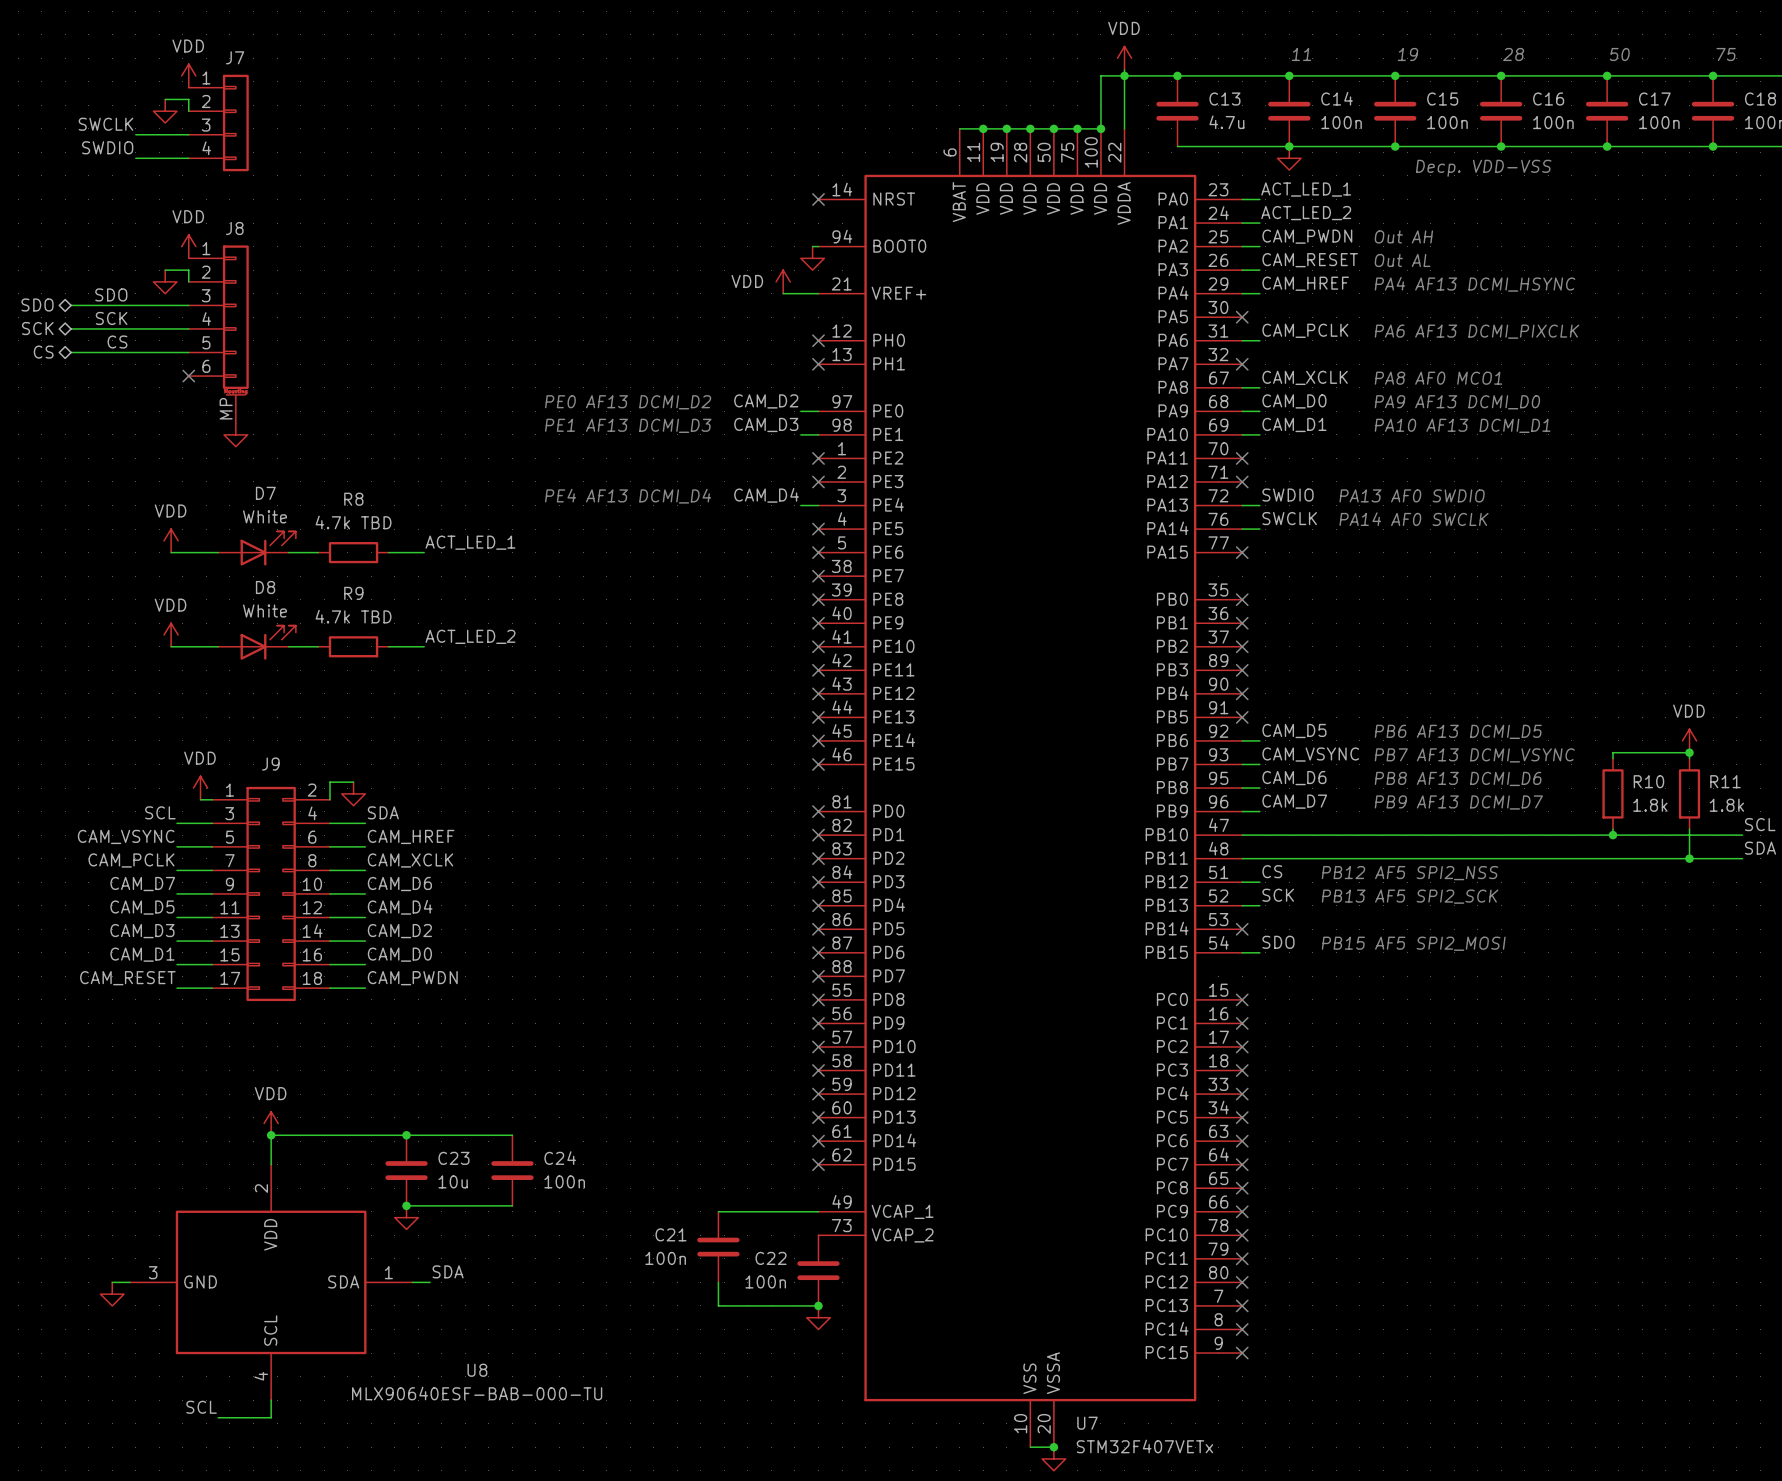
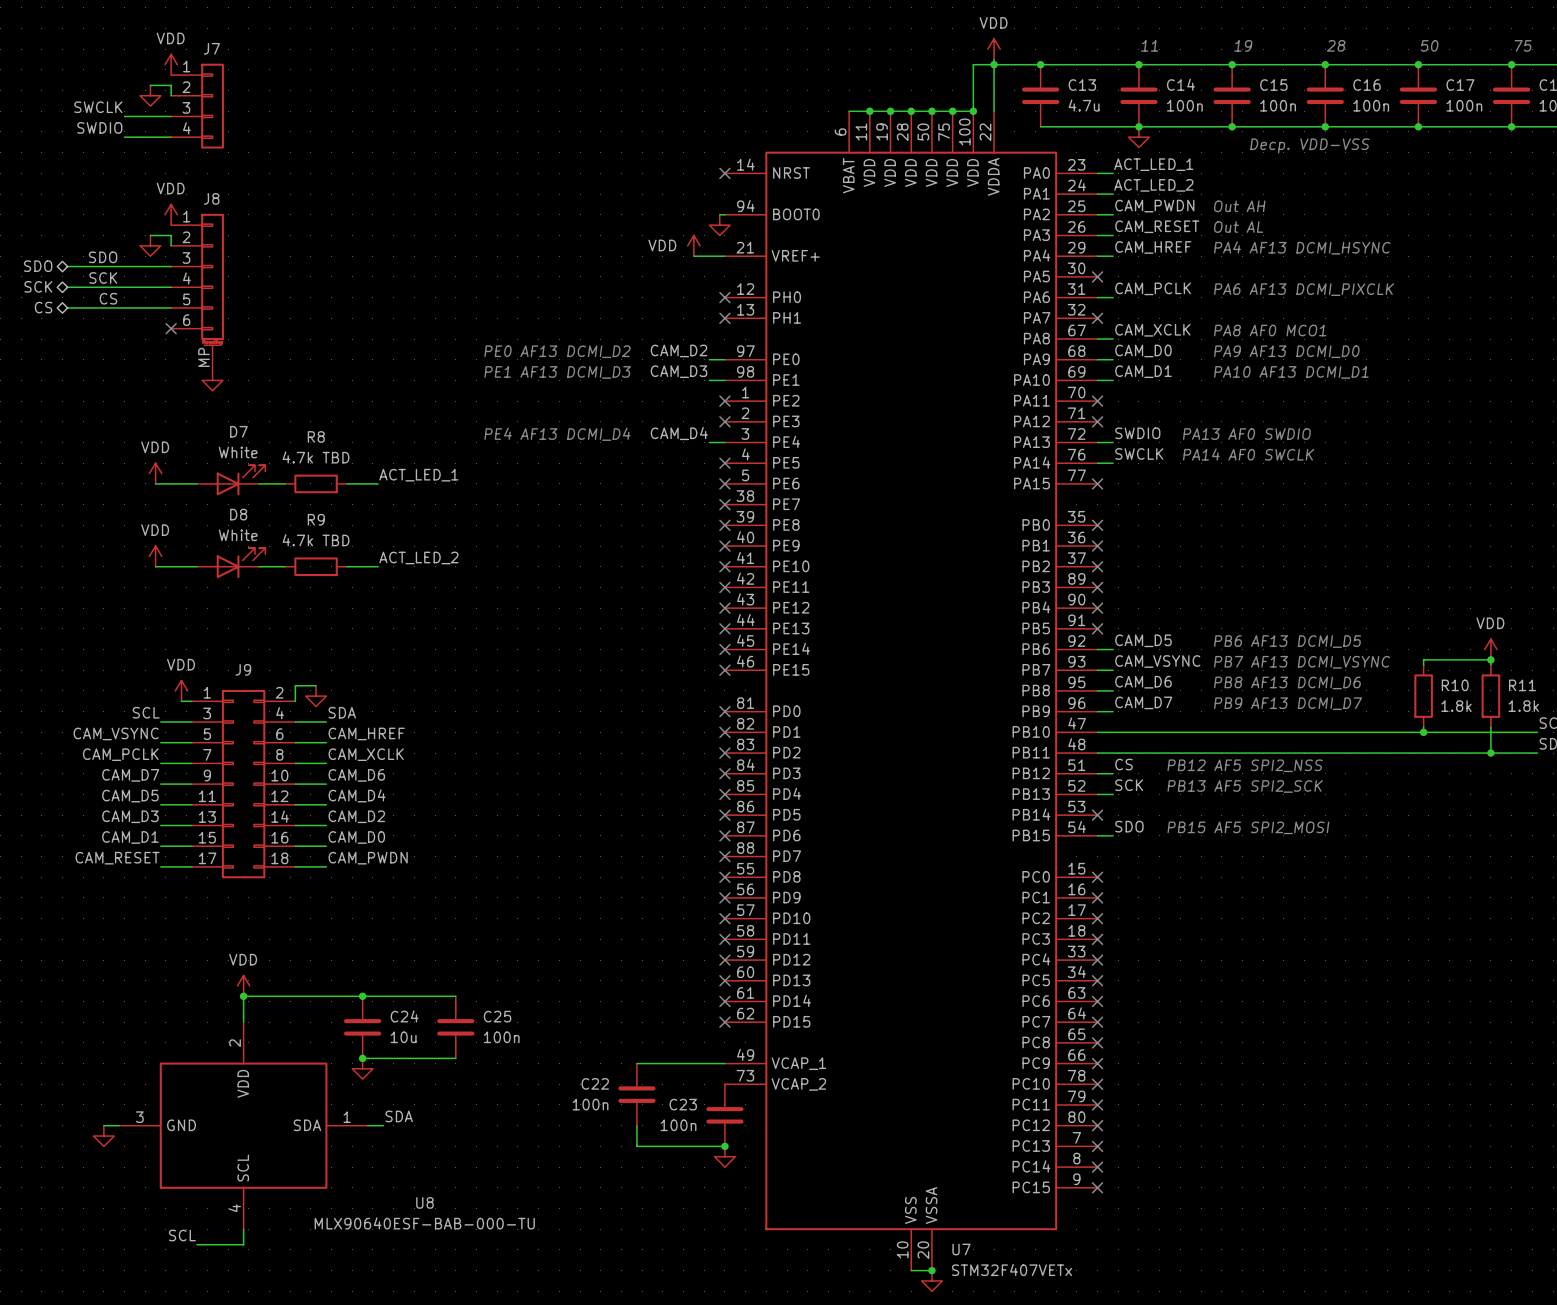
C23 name: C23 (453, 1158) -> C24 (404, 1016)
C24 name: C24 (560, 1158) -> C25 (497, 1016)
C21 name: C21 (670, 1234) -> C22 (595, 1083)
C22 name: C22 (771, 1258) -> C23 (683, 1104)

